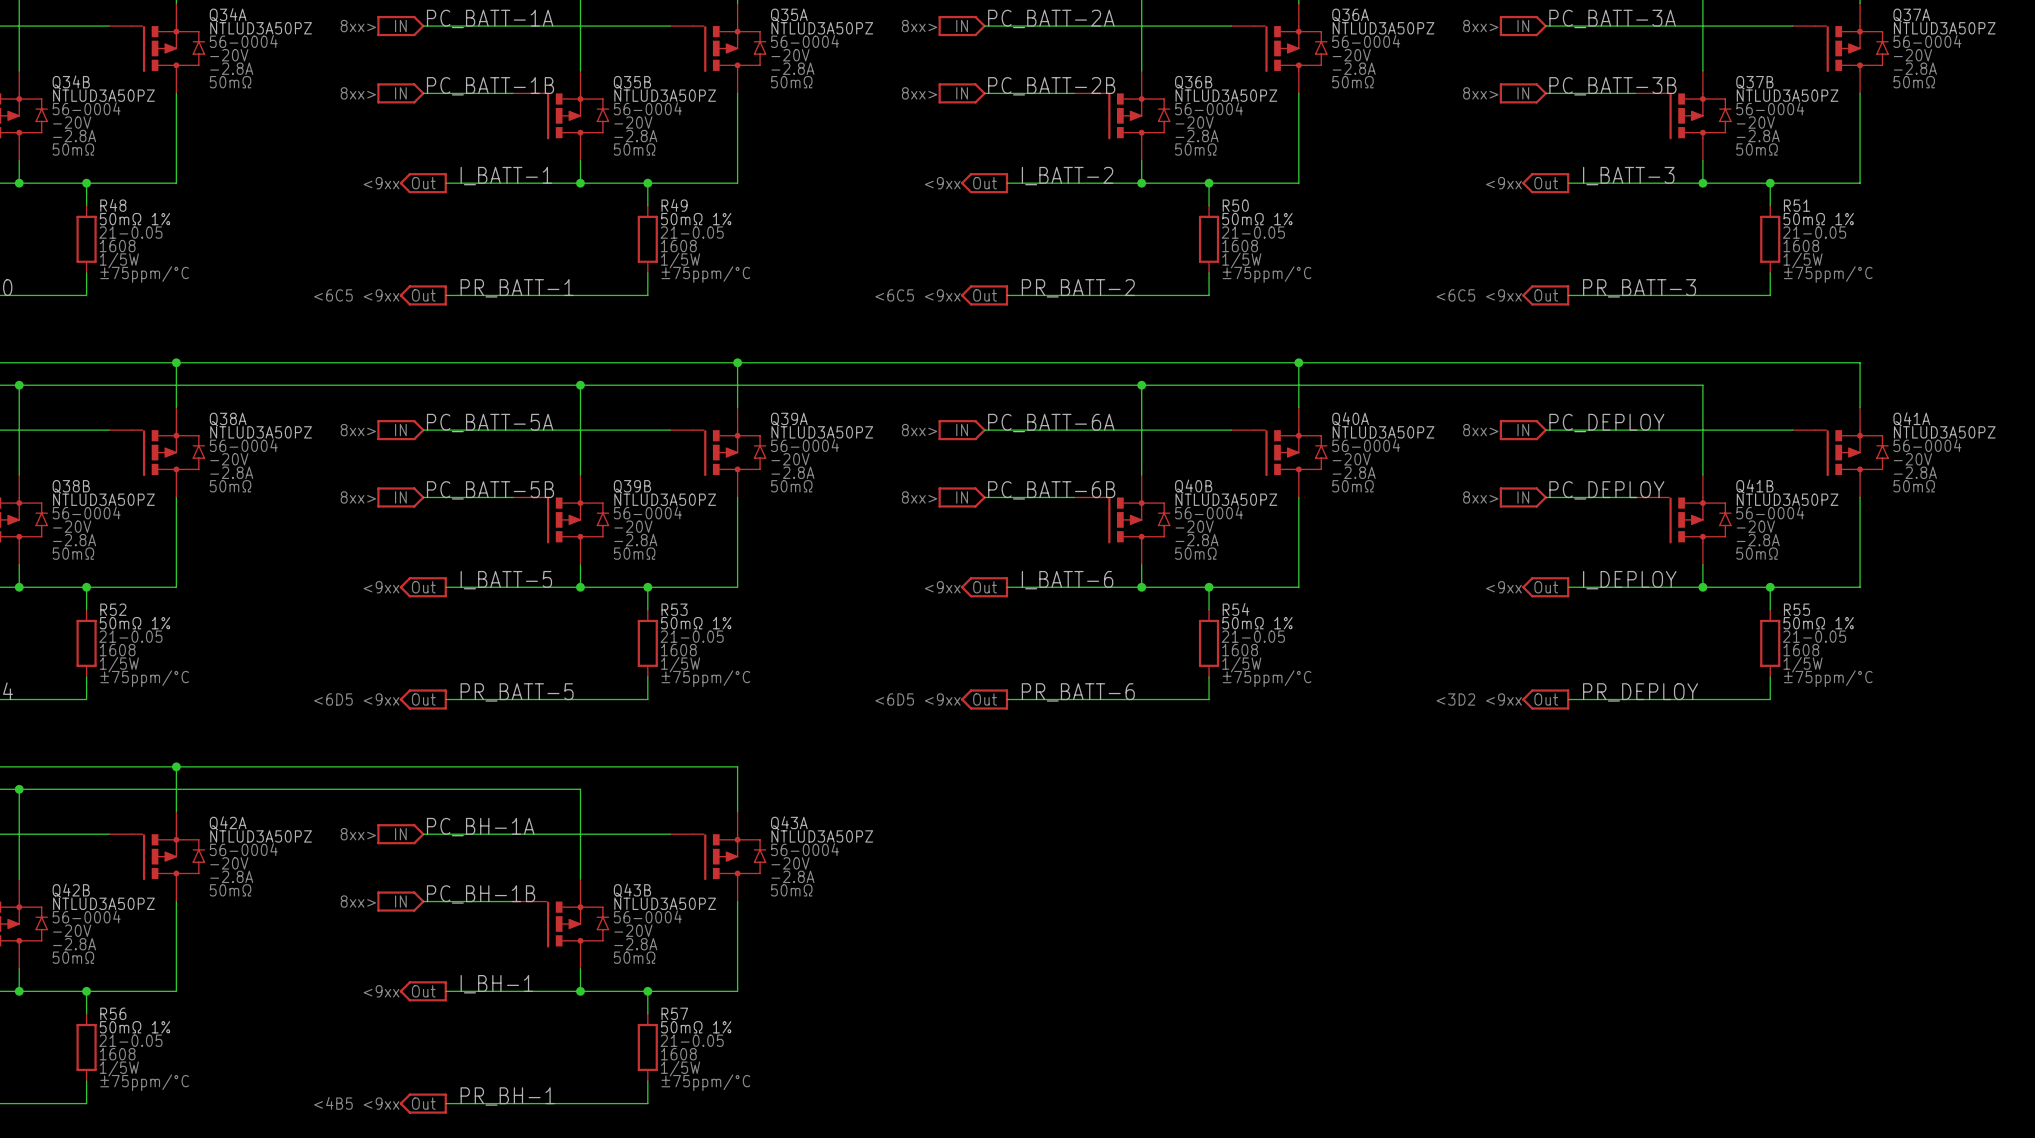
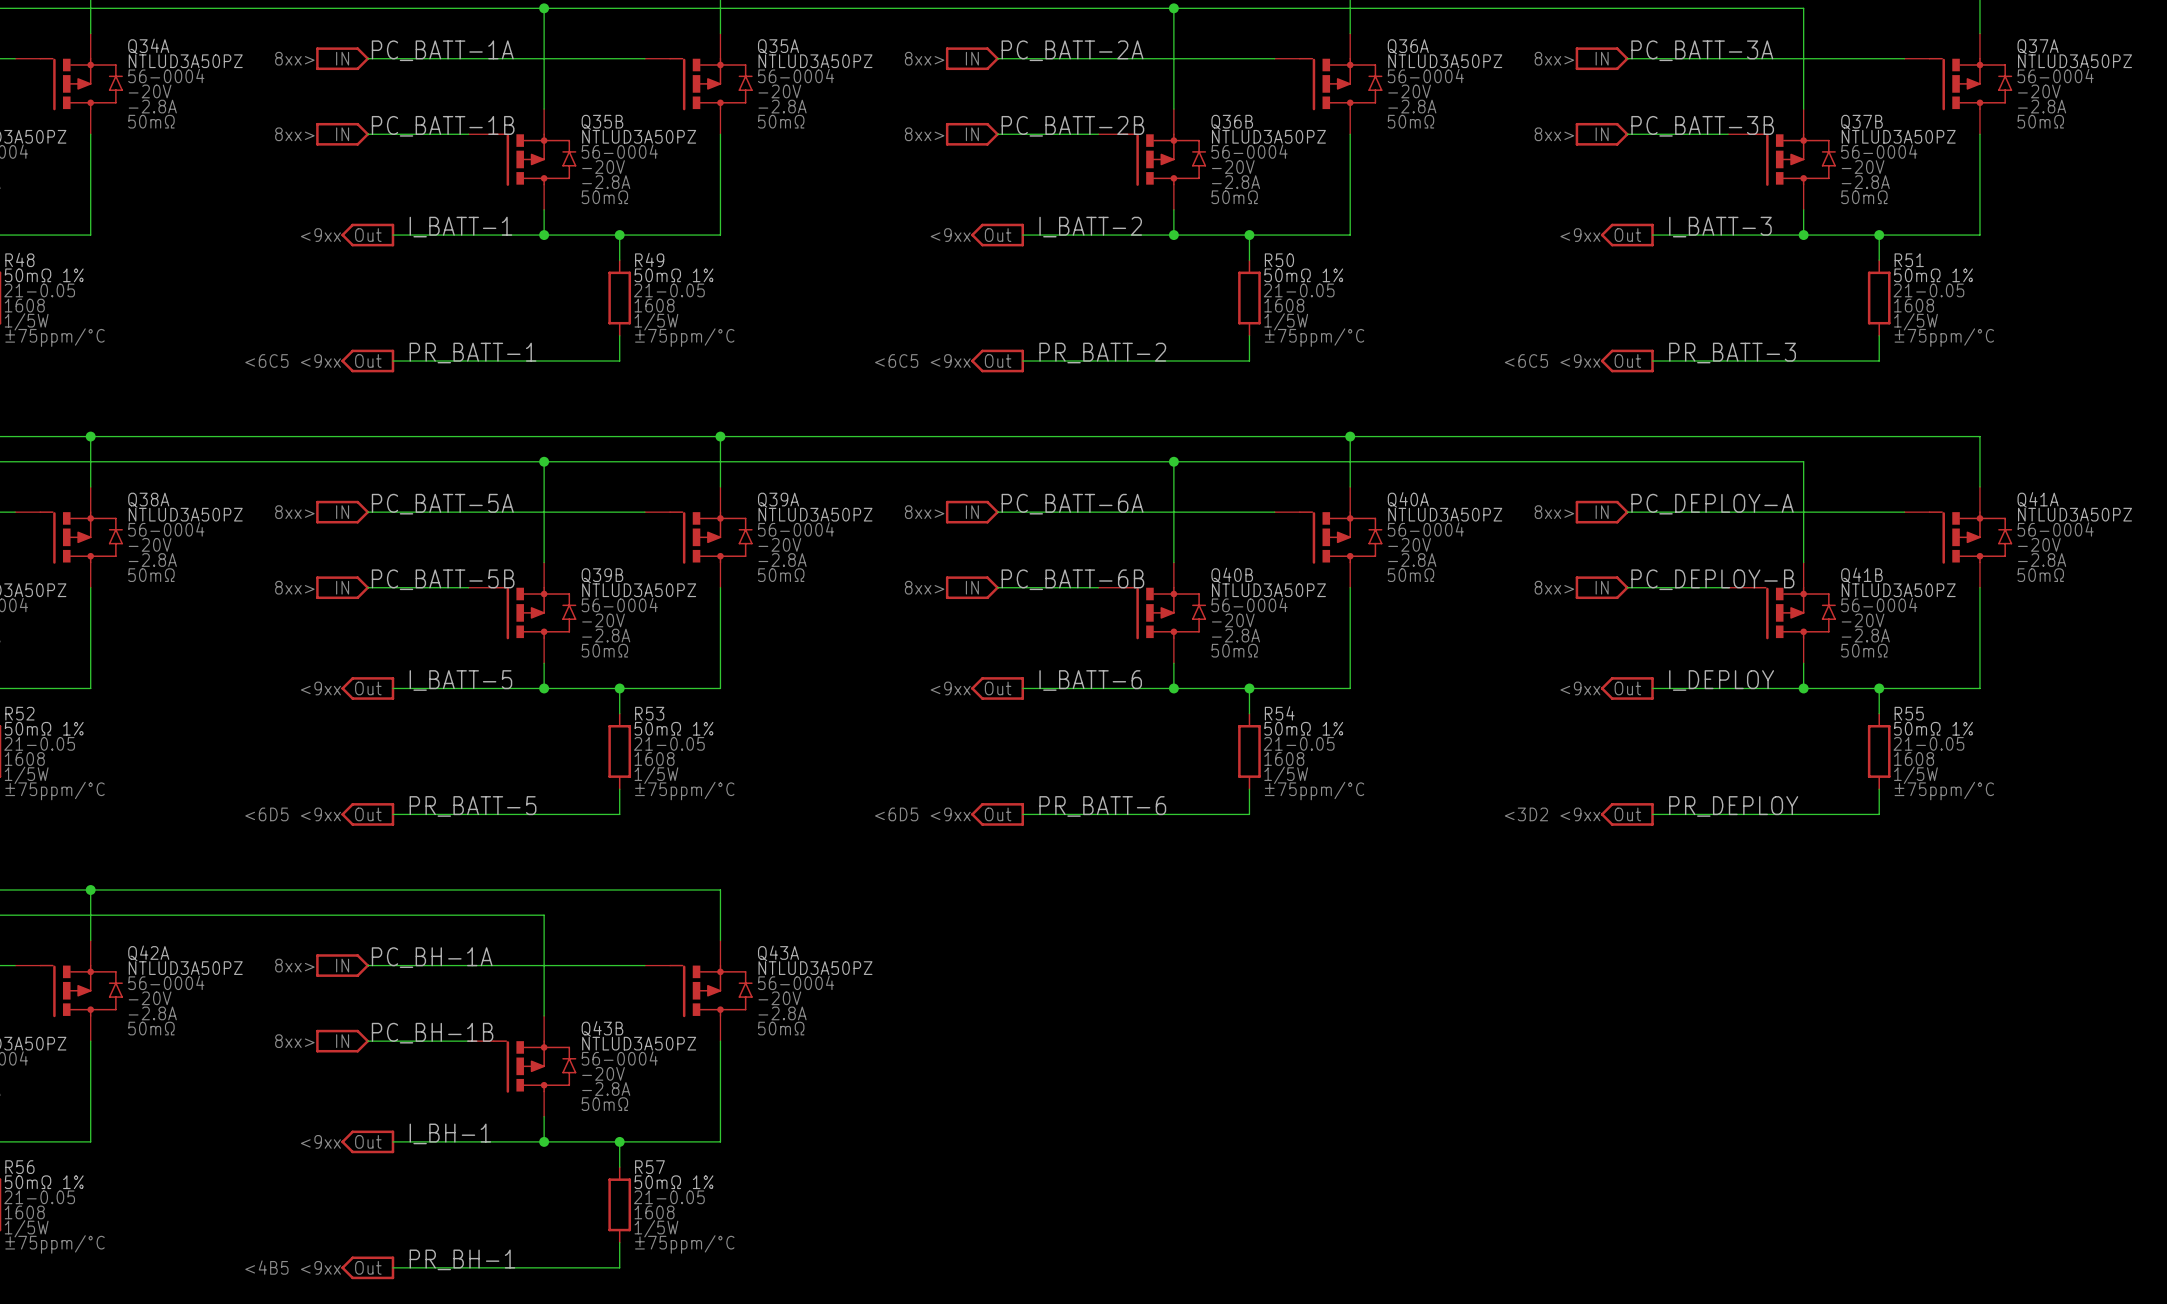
label: PC_DEPLOY (1606, 423) -> PC_DEPLOY-A (1712, 504)
label: PC_DEPLOY (1606, 490) -> PC_DEPLOY-B (1712, 579)

